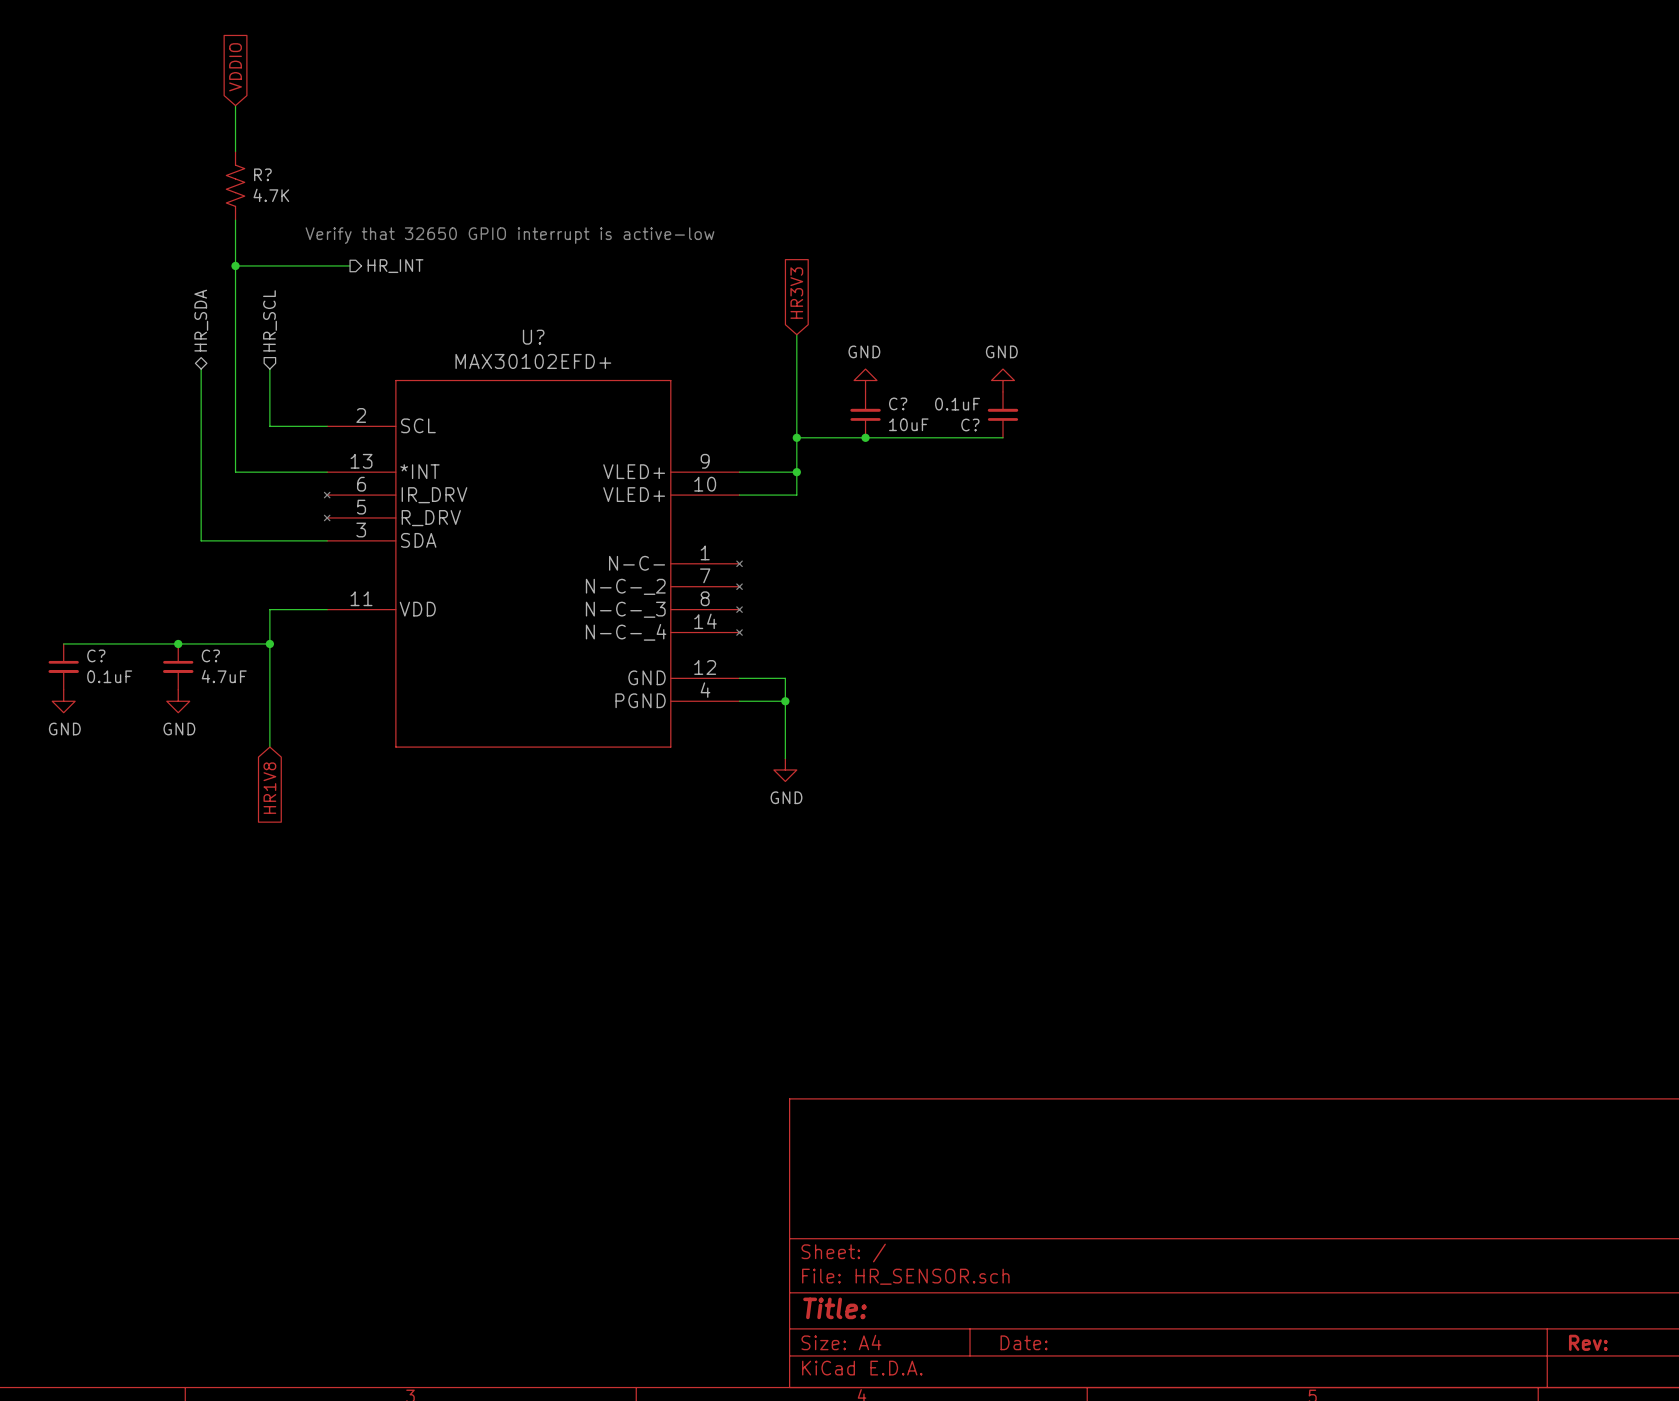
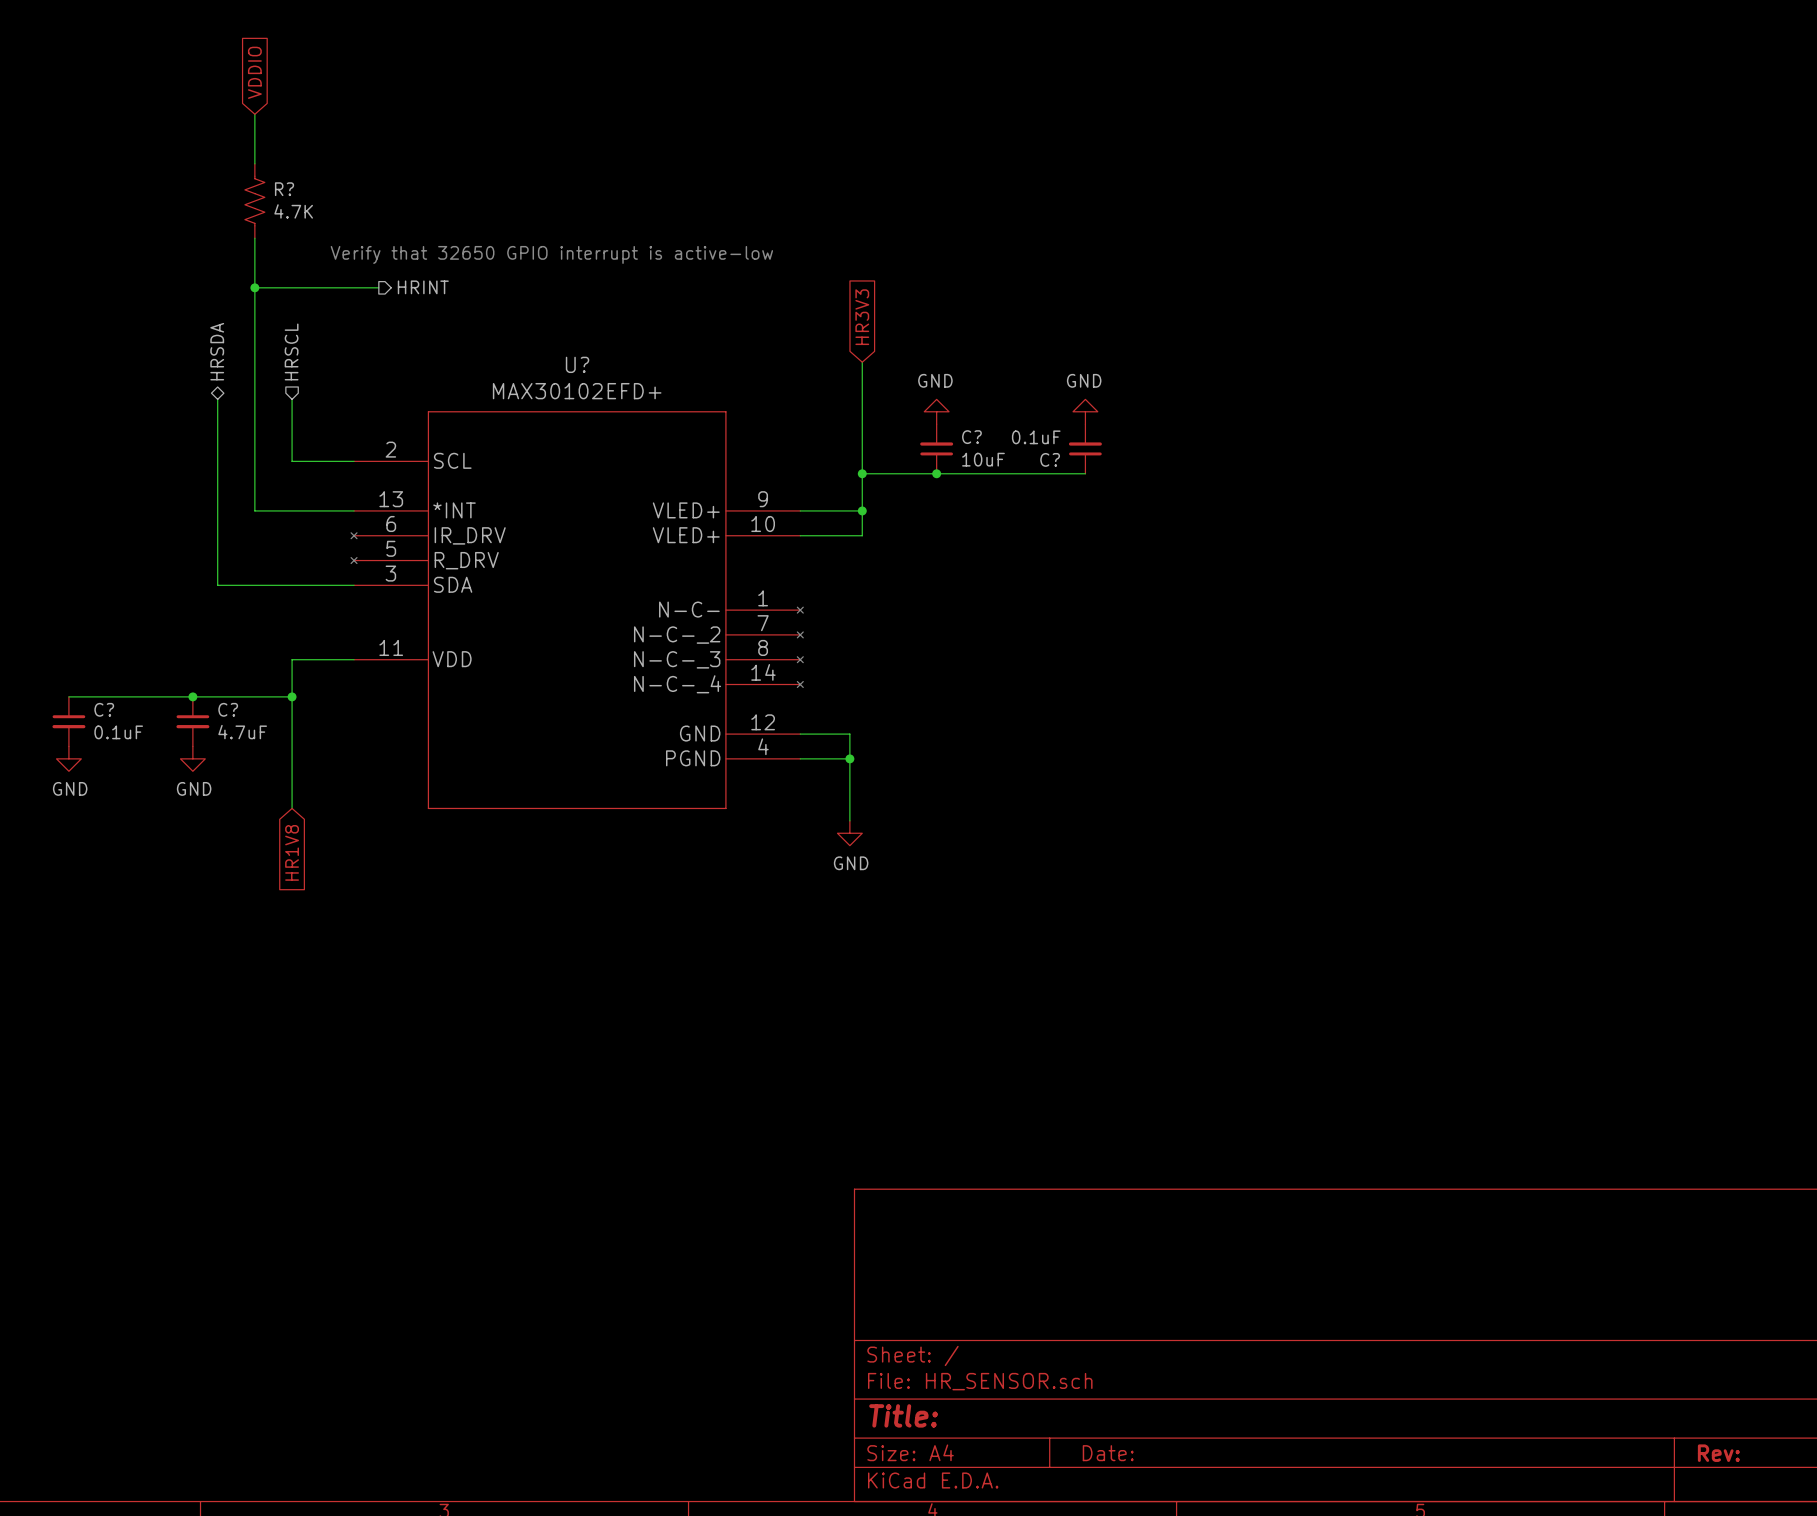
hierarchical label: HR_INT (395, 266) -> HRINT (423, 287)
hierarchical label: HR_SDA (201, 320) -> HRSDA (217, 351)
hierarchical label: HR_SCL (270, 320) -> HRSCL (291, 351)

